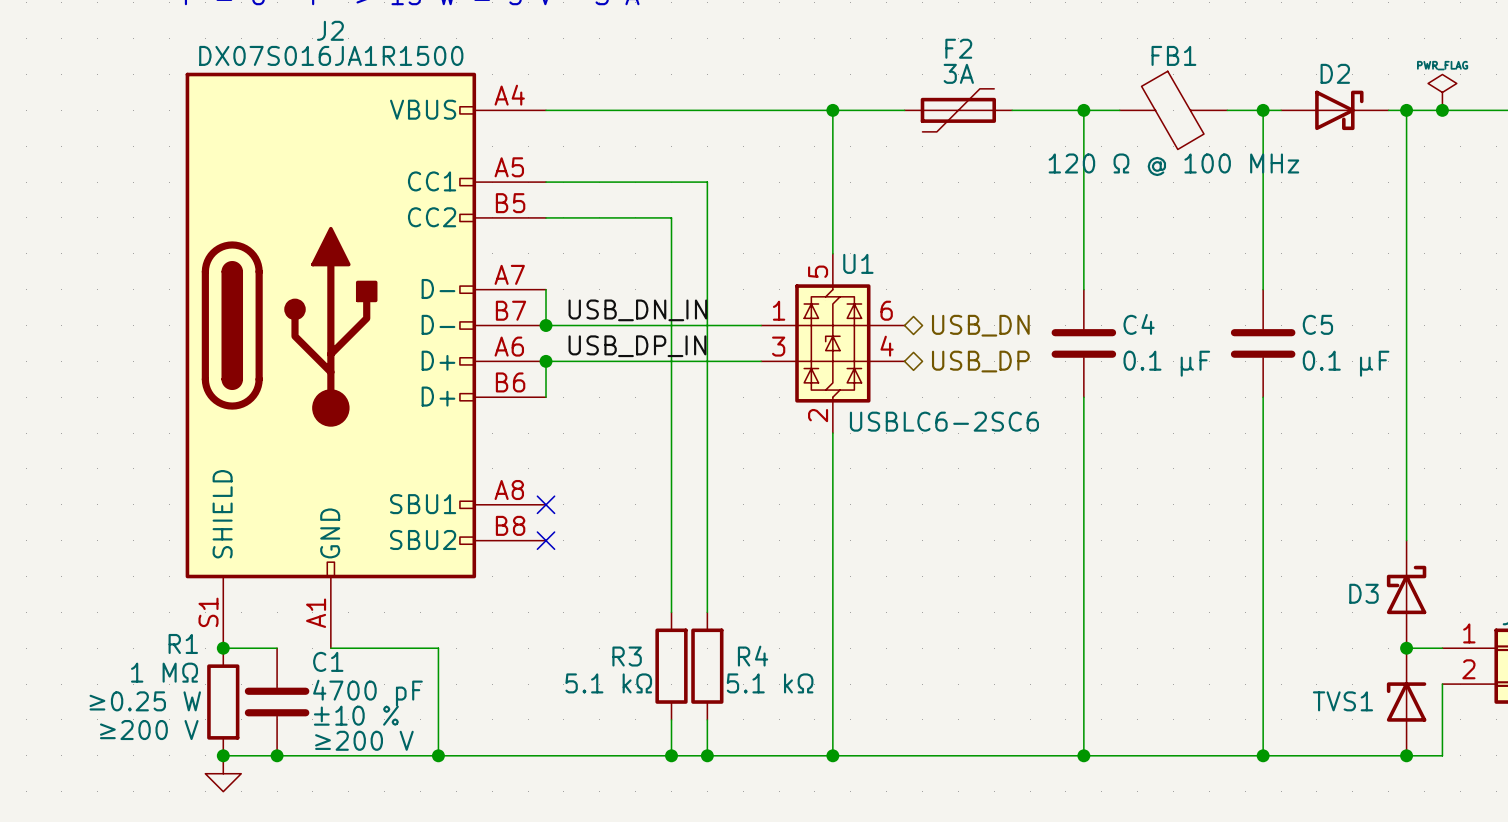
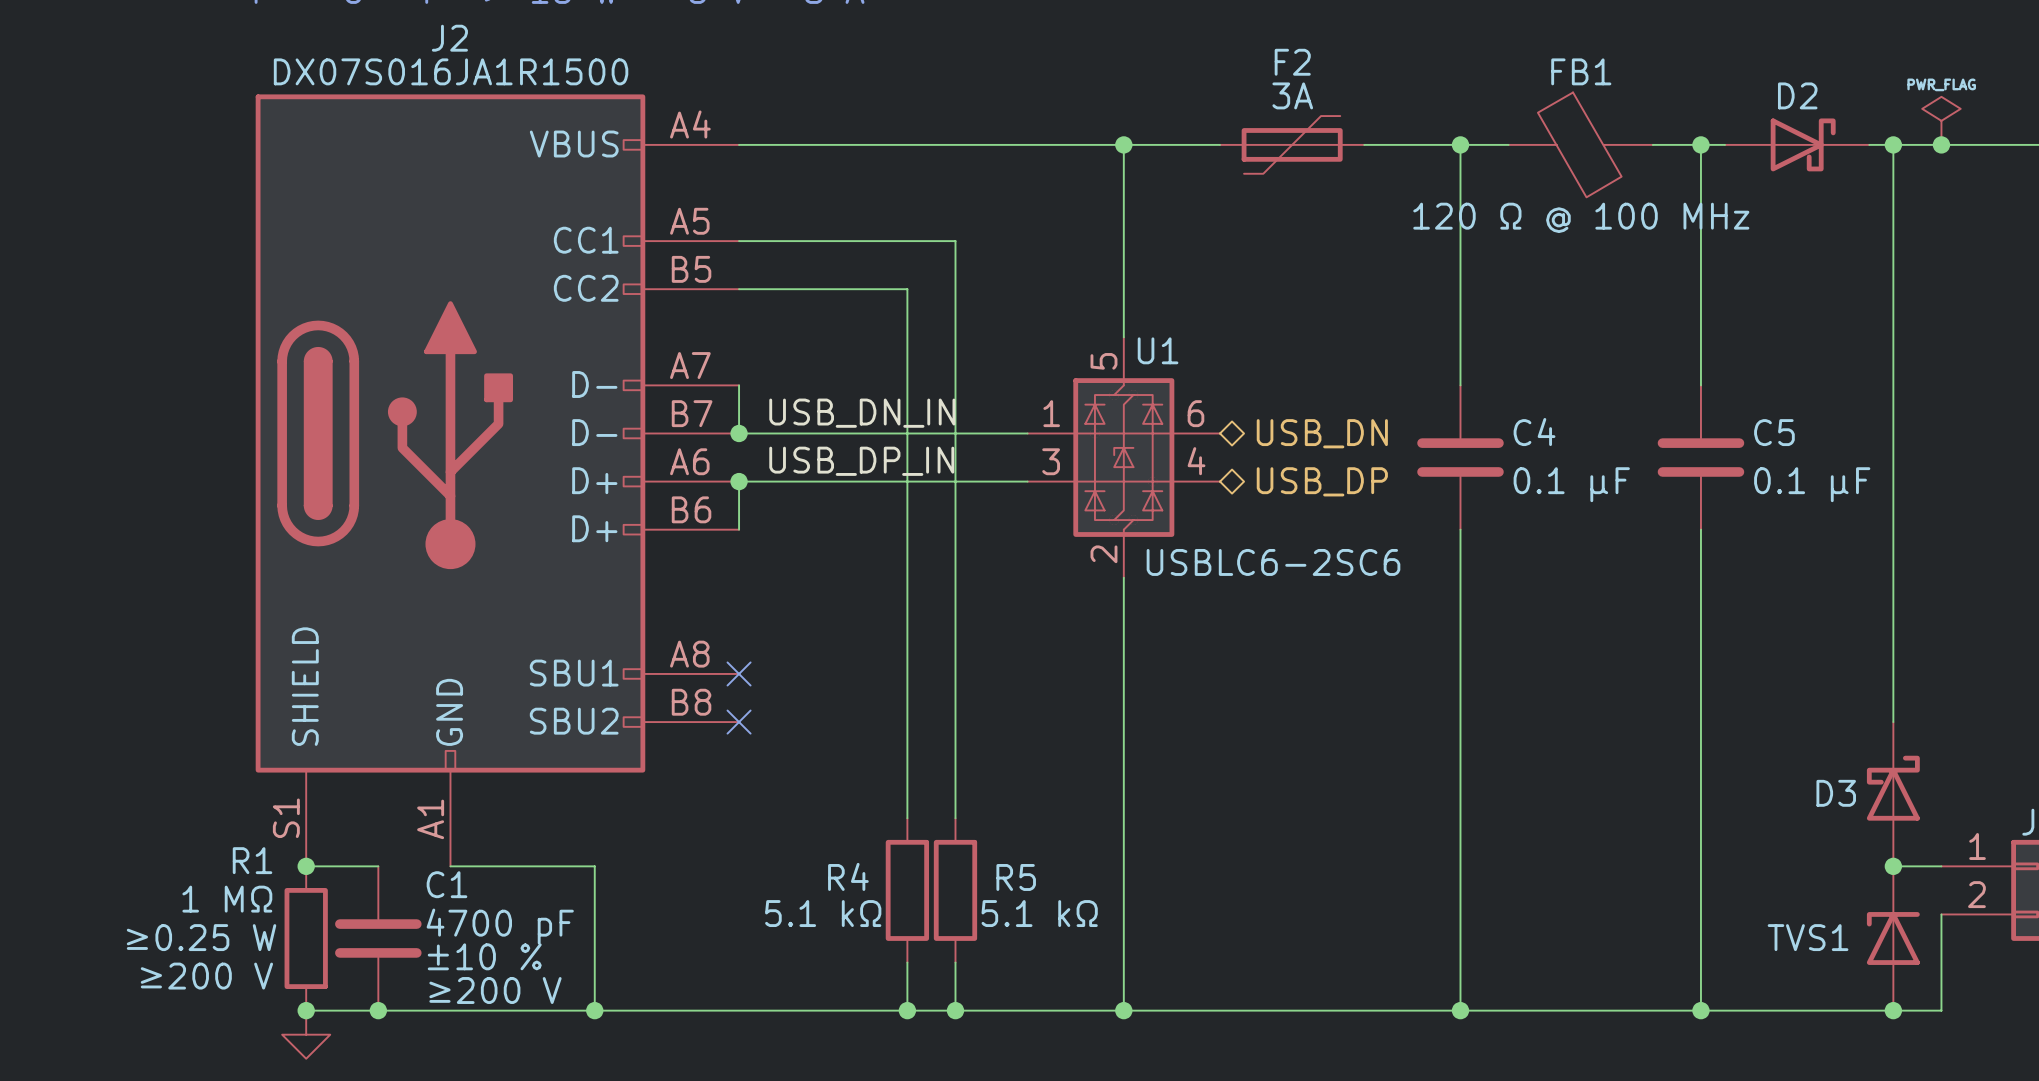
R3 name: R3 (627, 656) -> R4 (848, 876)
R4 name: R4 (753, 656) -> R5 (1016, 877)

